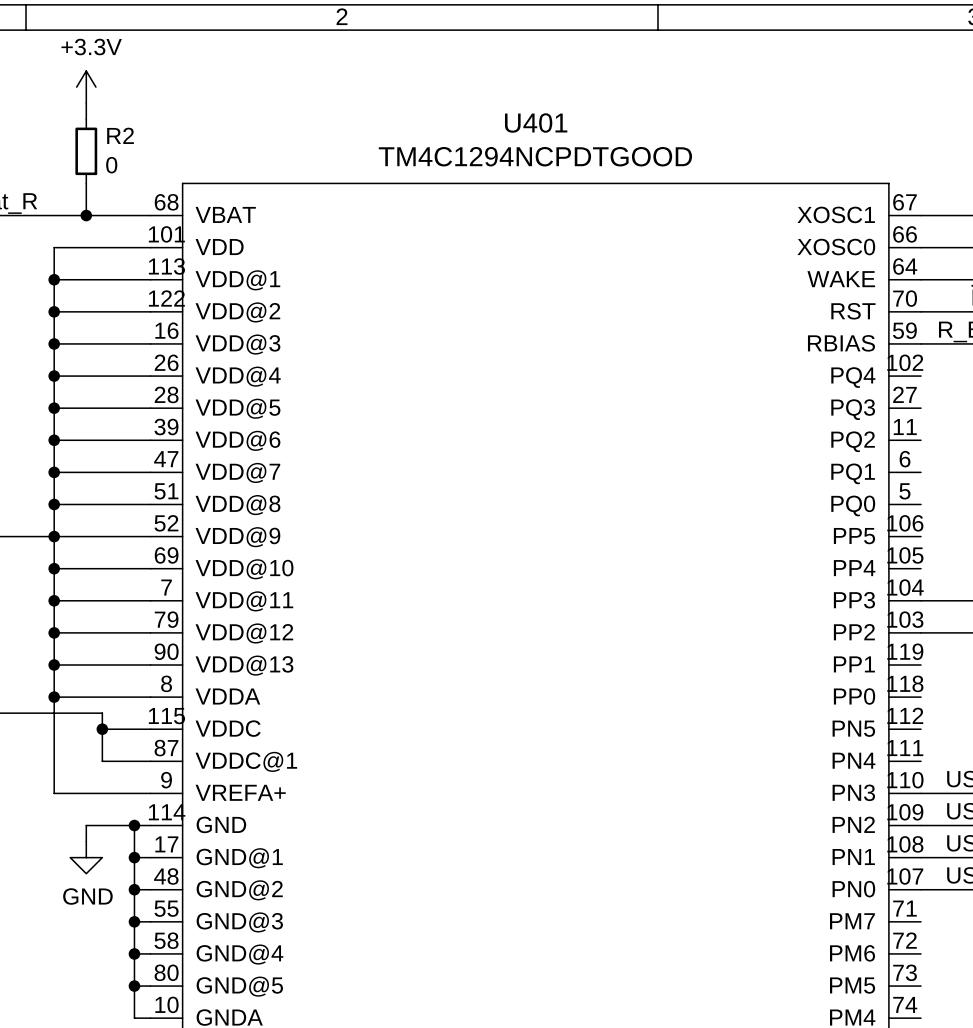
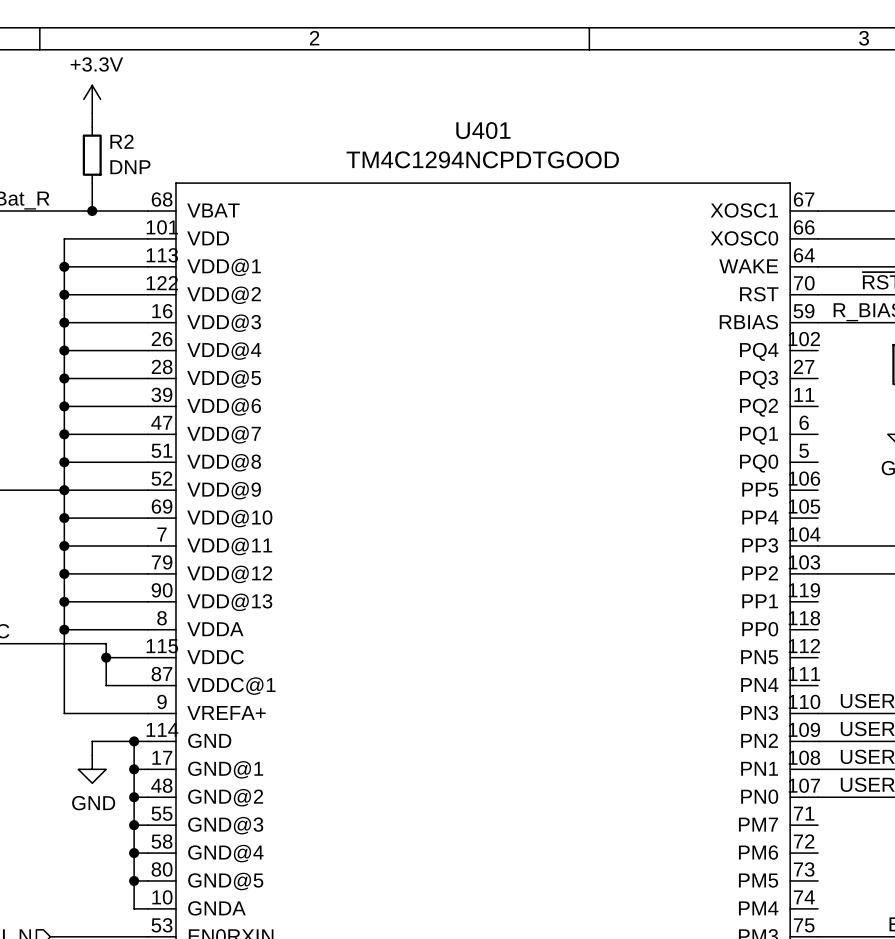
R2 value: 0 (111, 165) -> DNP (130, 167)

